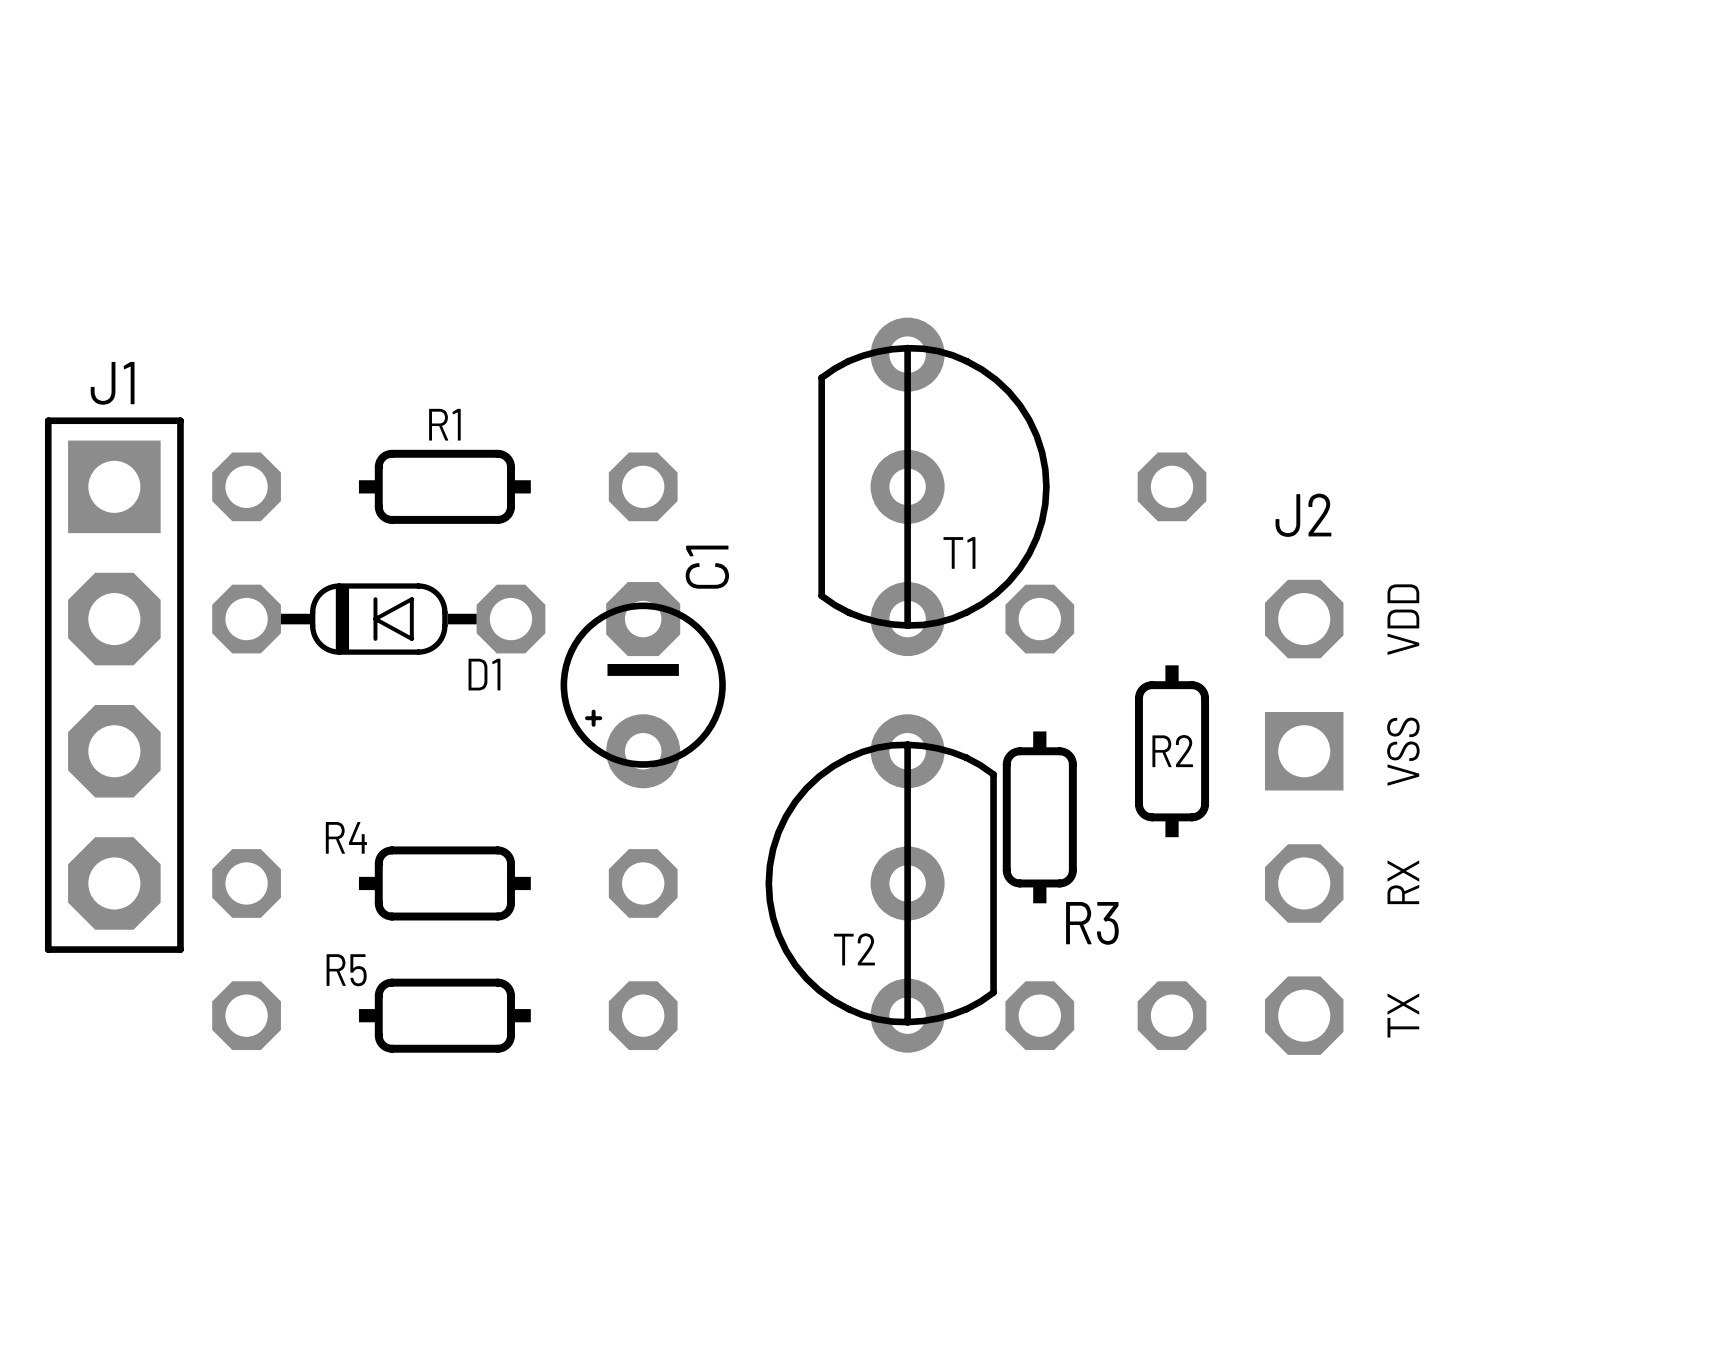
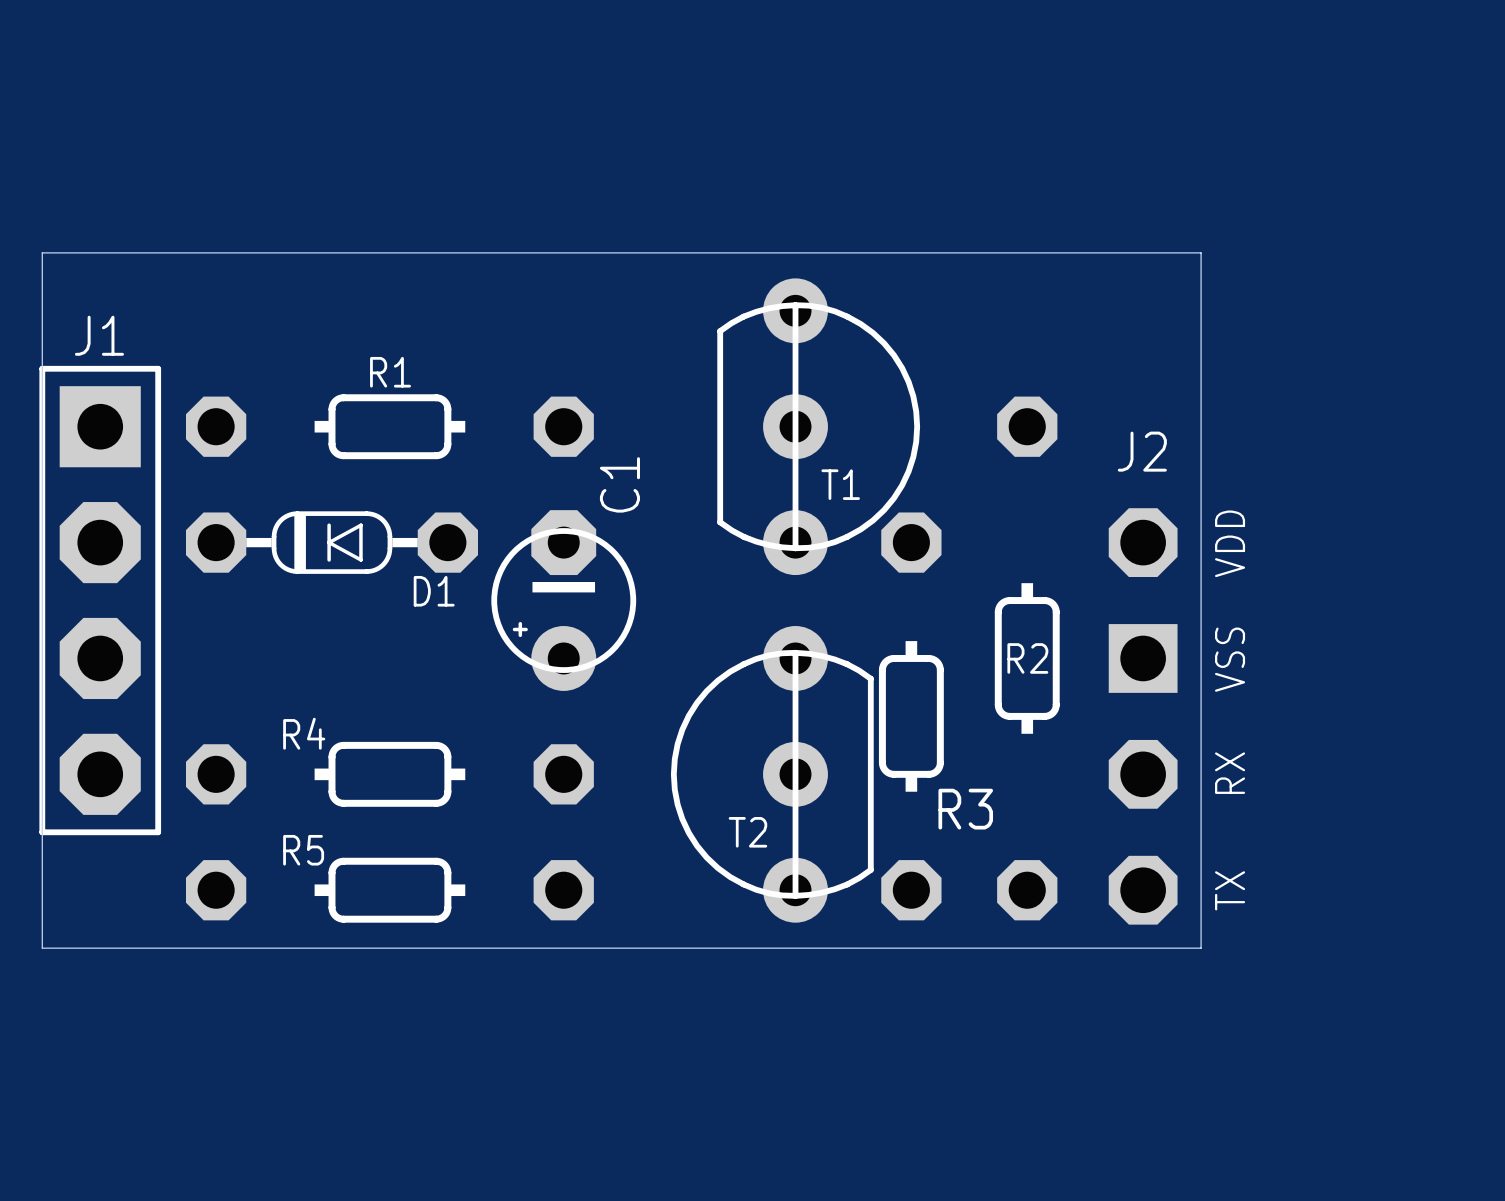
board edge: none -> (42, 252) (1201, 252) (1201, 948) (42, 948) (42, 252)

